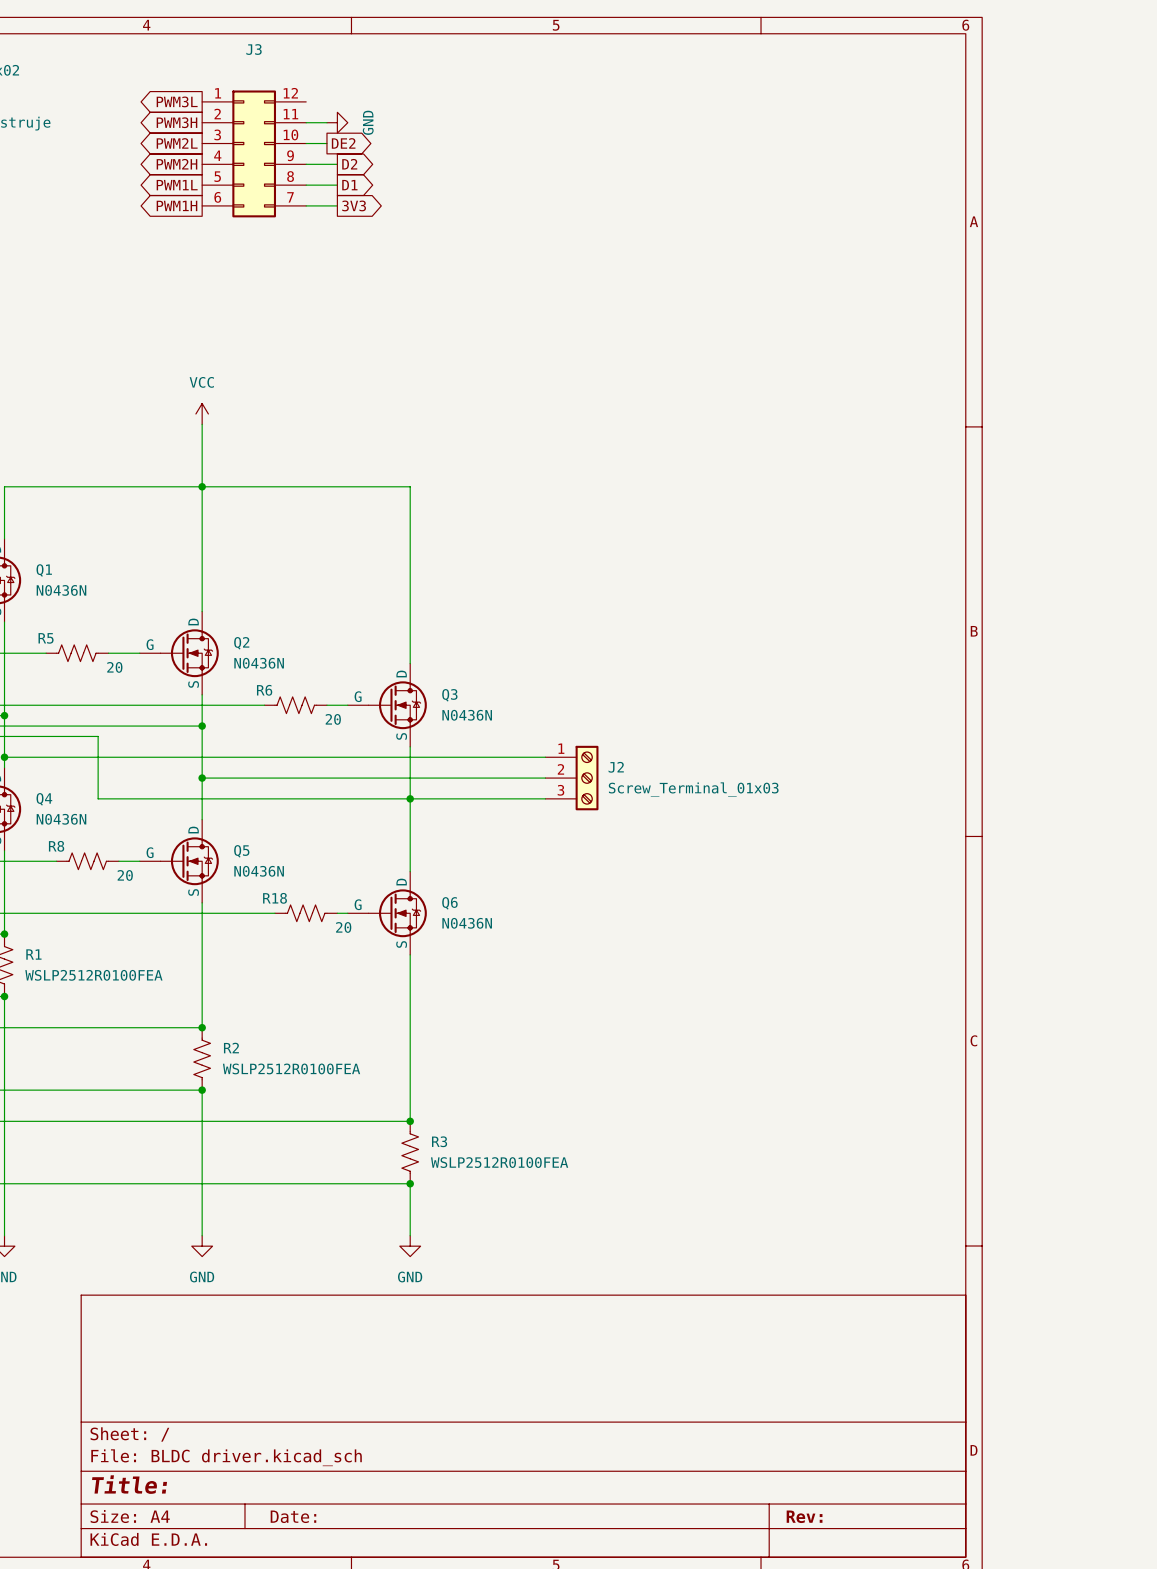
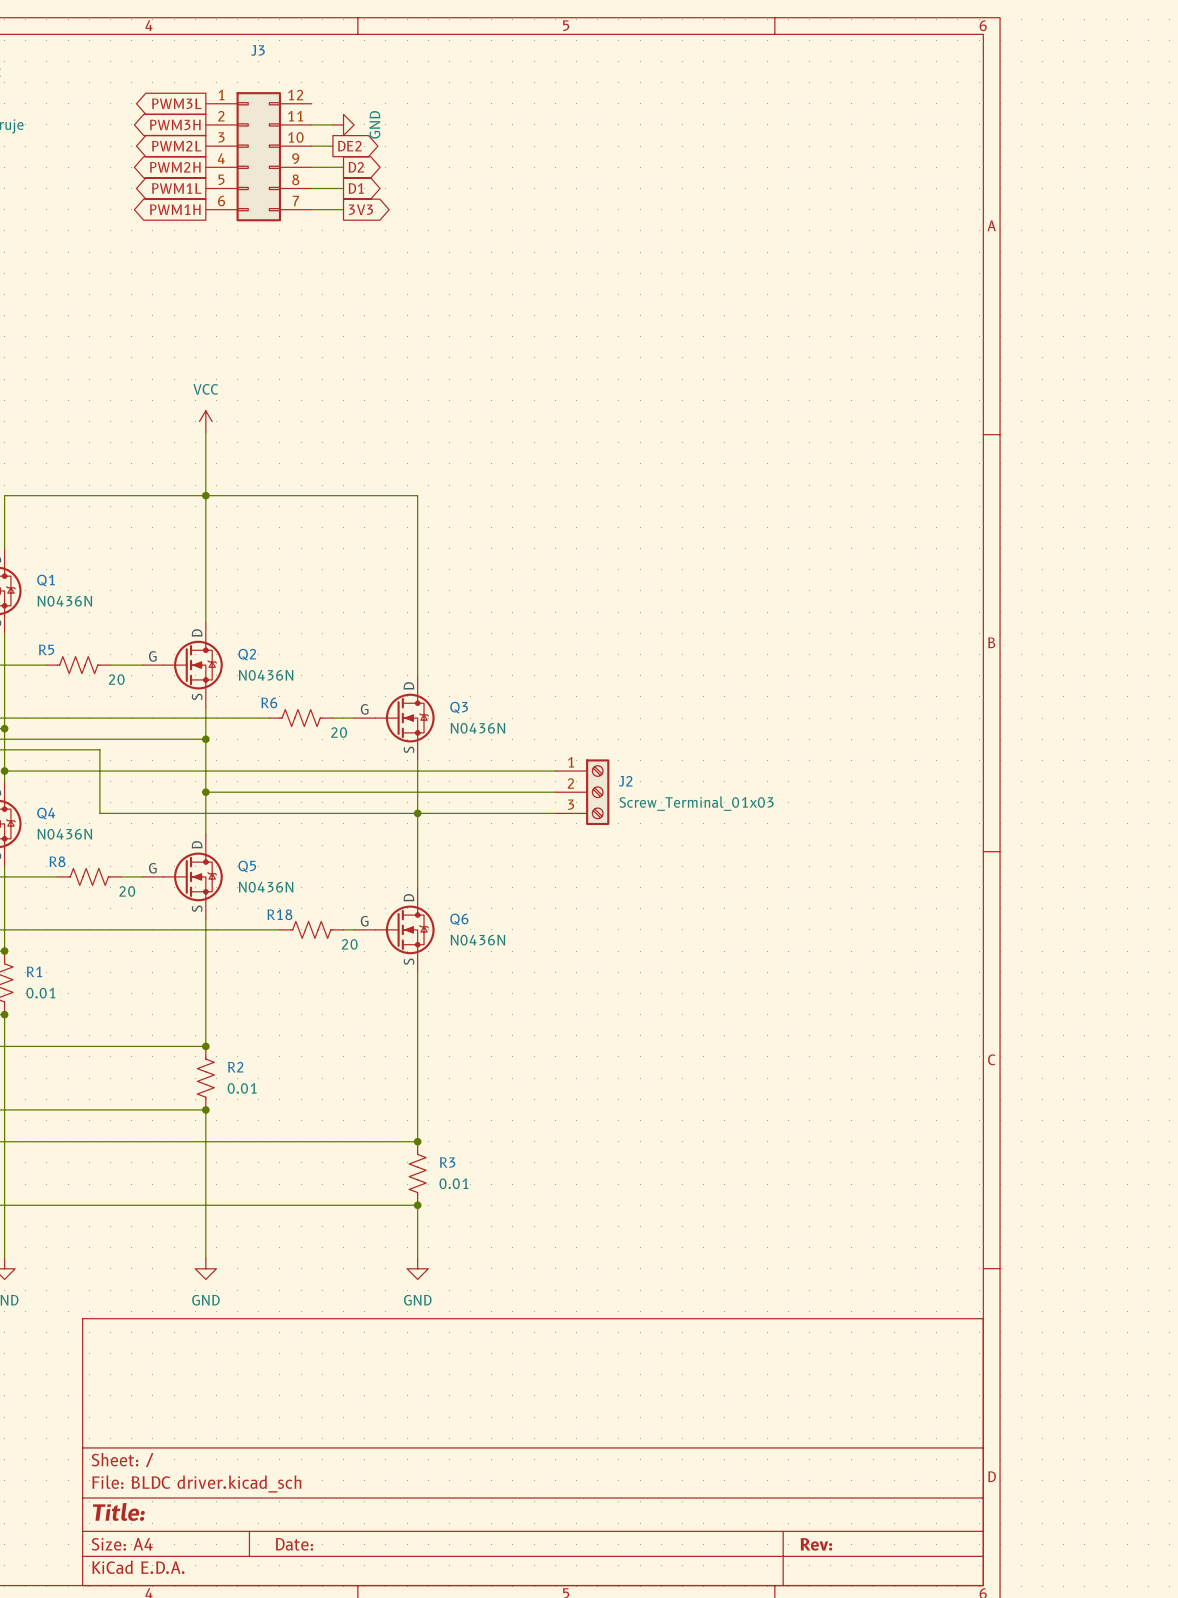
R1 value: WSLP2512R0100FEA (93, 975) -> 0.01 (40, 993)
R2 value: WSLP2512R0100FEA (291, 1068) -> 0.01 (242, 1088)
R3 value: WSLP2512R0100FEA (499, 1162) -> 0.01 (453, 1183)

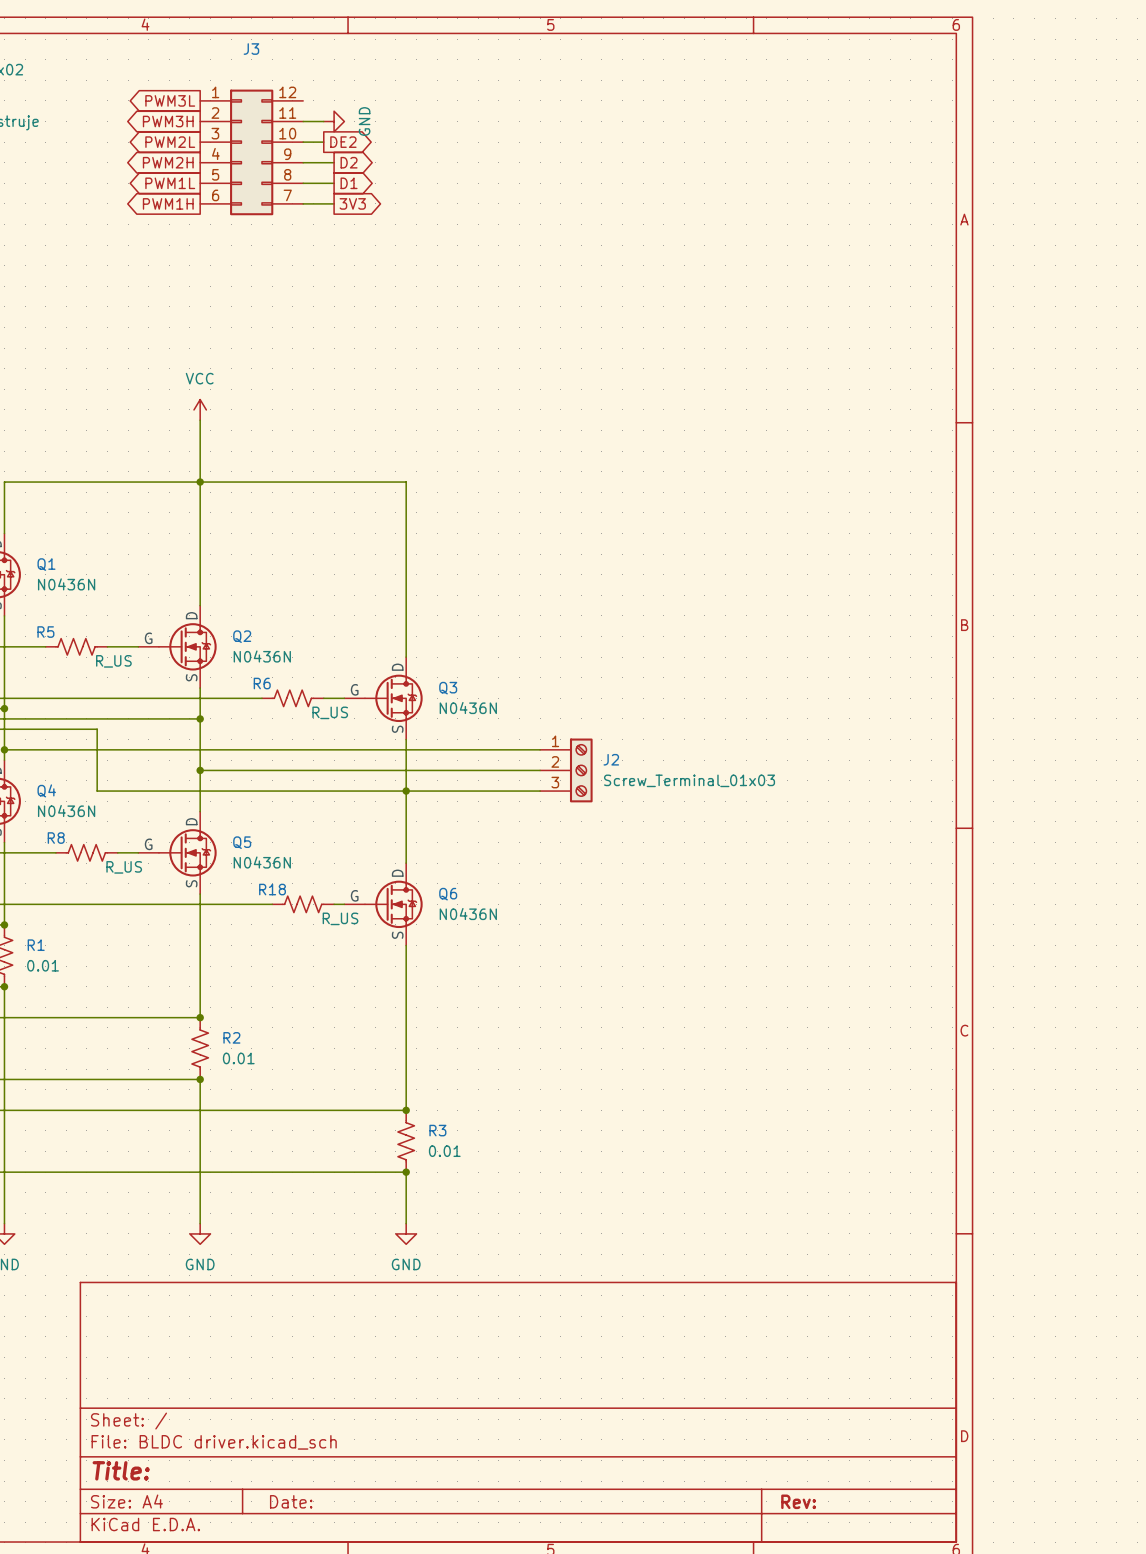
R5 value: 20 (116, 679) -> R_US (113, 661)
R6 value: 20 (339, 732) -> R_US (330, 712)
R8 value: 20 (127, 891) -> R_US (124, 867)
R18 value: 20 (349, 944) -> R_US (340, 918)

